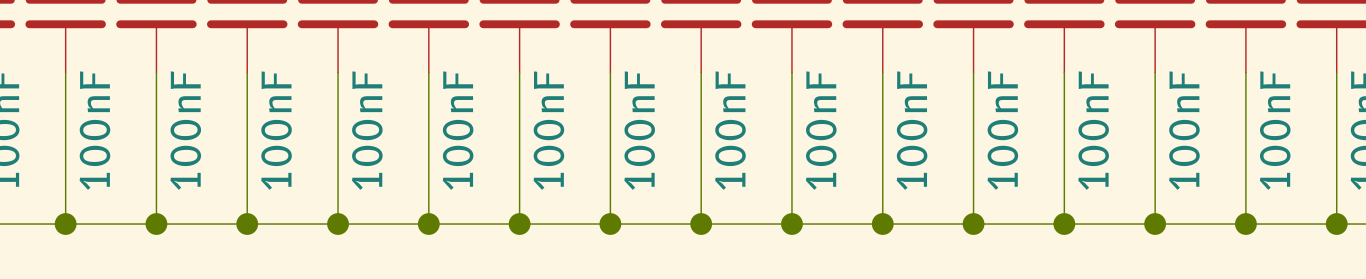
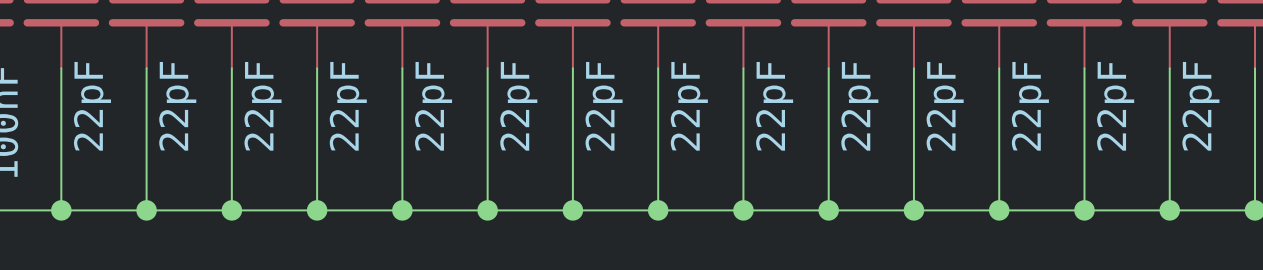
part value: 100nF (94, 130) -> 22pF (92, 106)
part value: 100nF (185, 130) -> 22pF (177, 106)
part value: 100nF (276, 130) -> 22pF (263, 106)
part value: 100nF (367, 130) -> 22pF (348, 106)
part value: 100nF (458, 130) -> 22pF (433, 106)
part value: 100nF (548, 130) -> 22pF (518, 106)
part value: 100nF (639, 130) -> 22pF (604, 106)
part value: 100nF (730, 130) -> 22pF (689, 106)
part value: 100nF (821, 130) -> 22pF (774, 106)
part value: 100nF (912, 130) -> 22pF (859, 106)
part value: 100nF (1002, 130) -> 22pF (945, 106)
part value: 100nF (1093, 130) -> 22pF (1030, 106)
part value: 100nF (1184, 130) -> 22pF (1115, 106)
part value: 100nF (1275, 130) -> 22pF (1200, 106)

